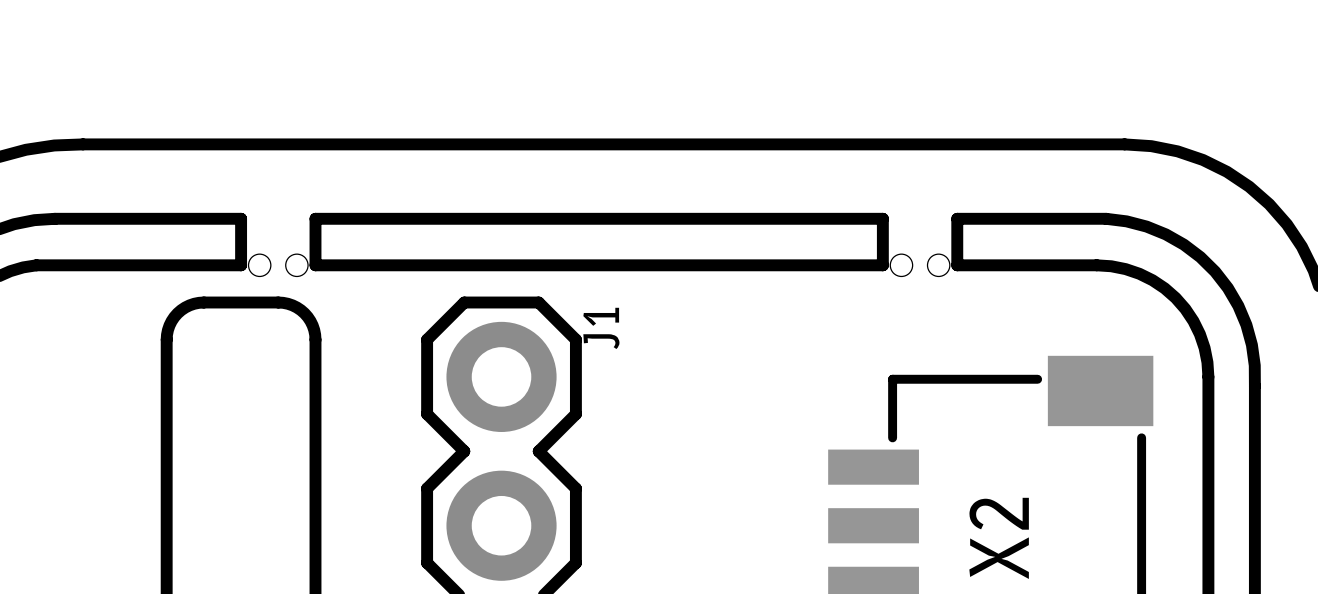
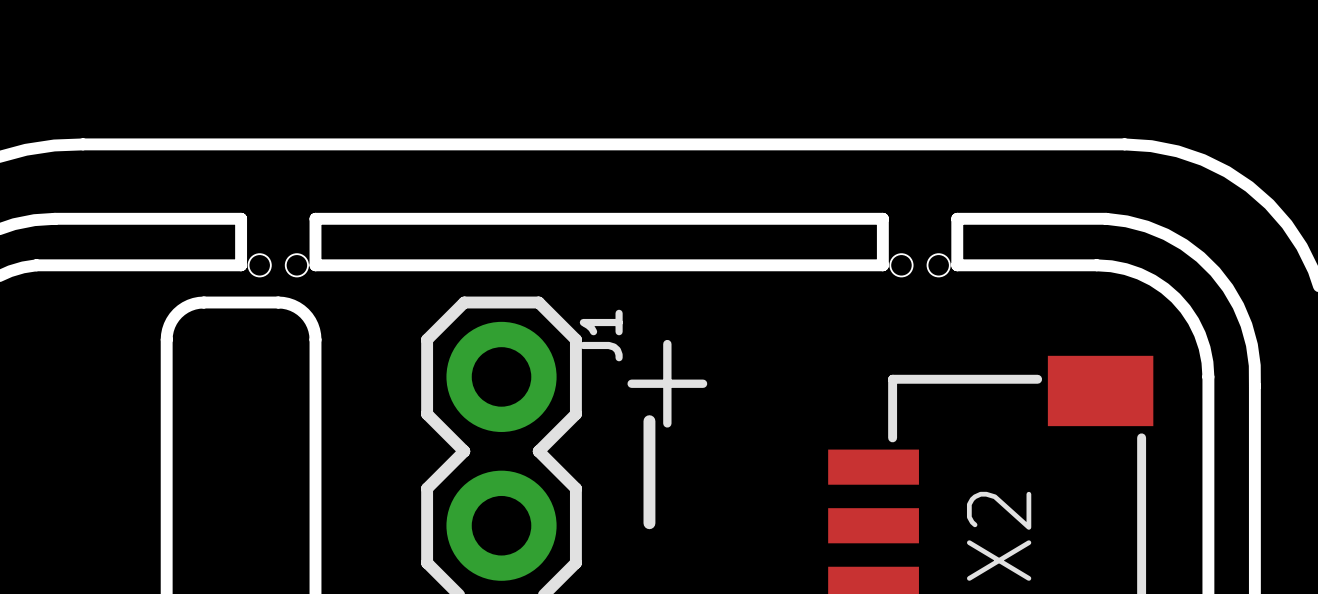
text: none -> + (667, 383)
text: none -> - (649, 472)

